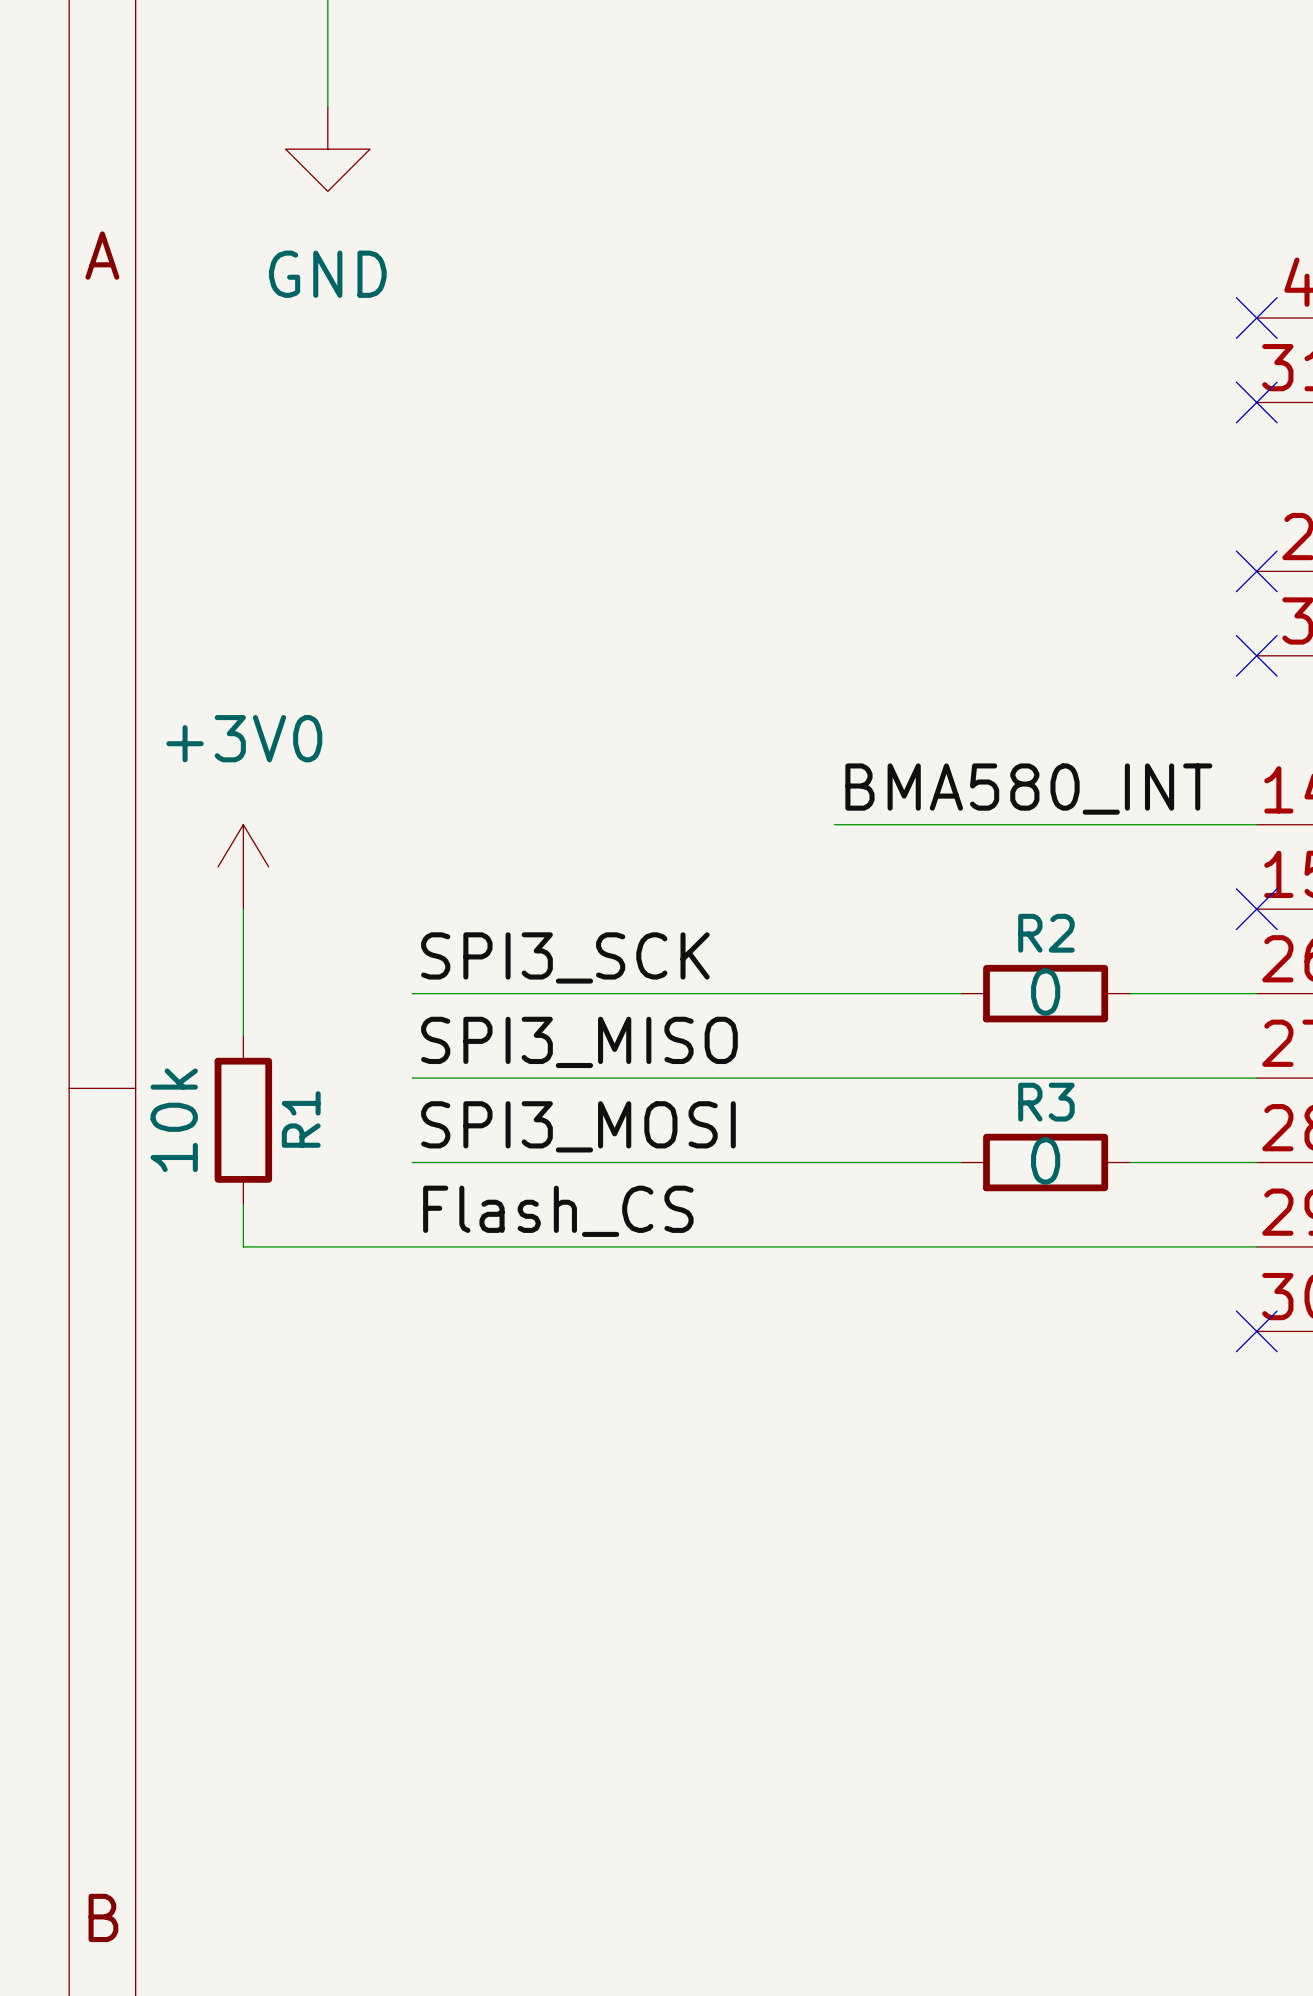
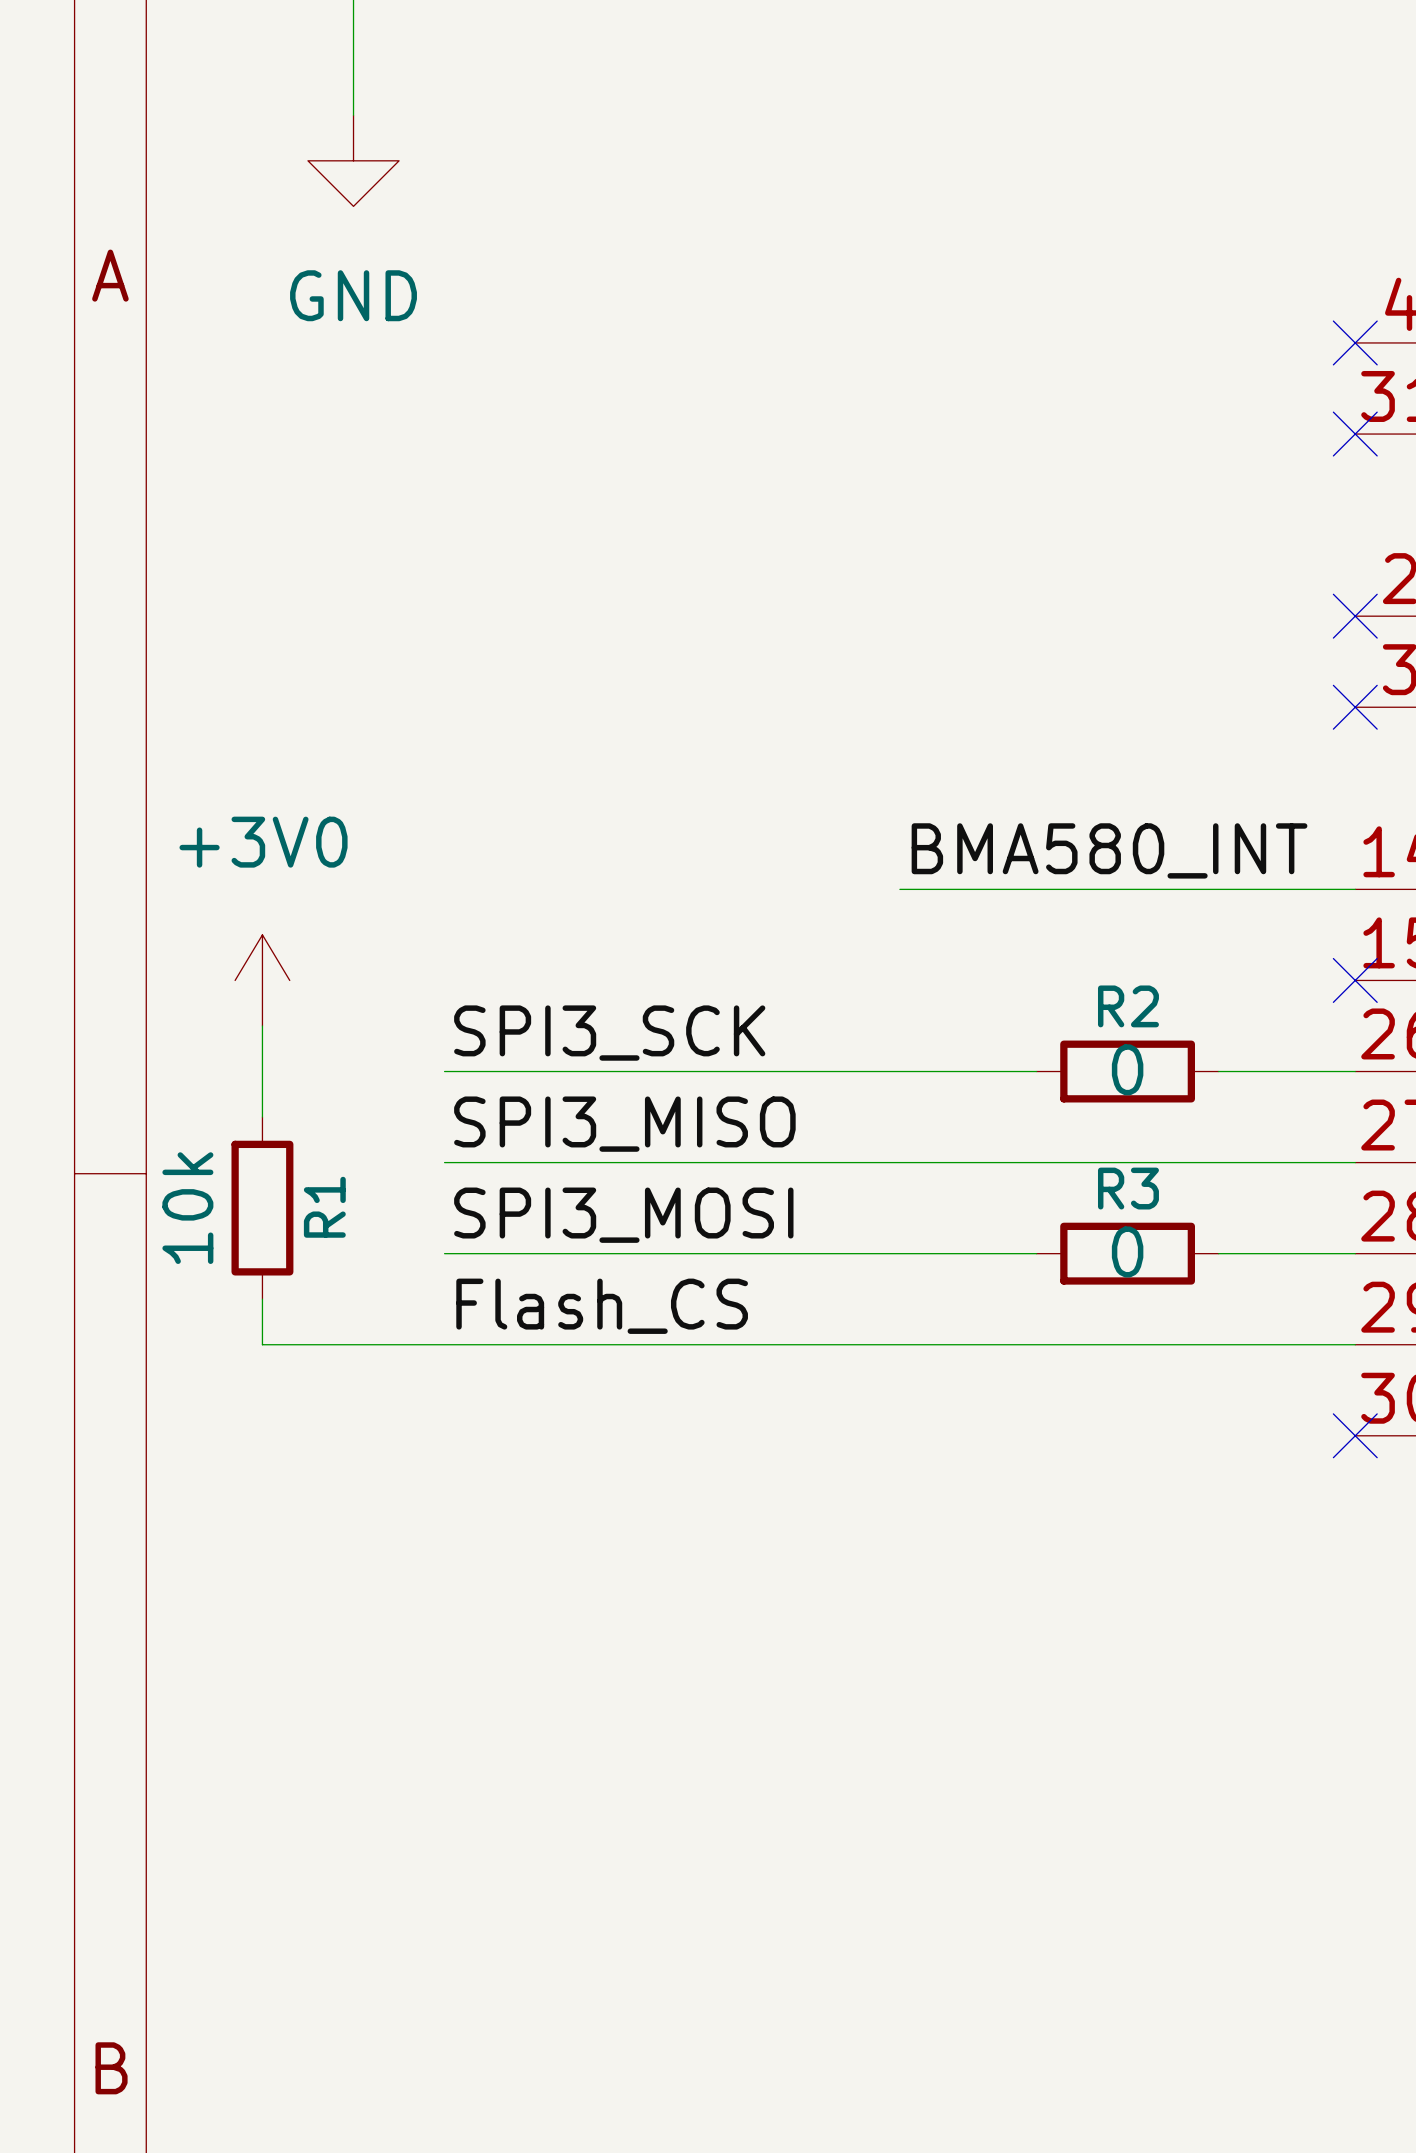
power symbol position: +3V0 (243, 866) -> +3V0 (262, 980)

